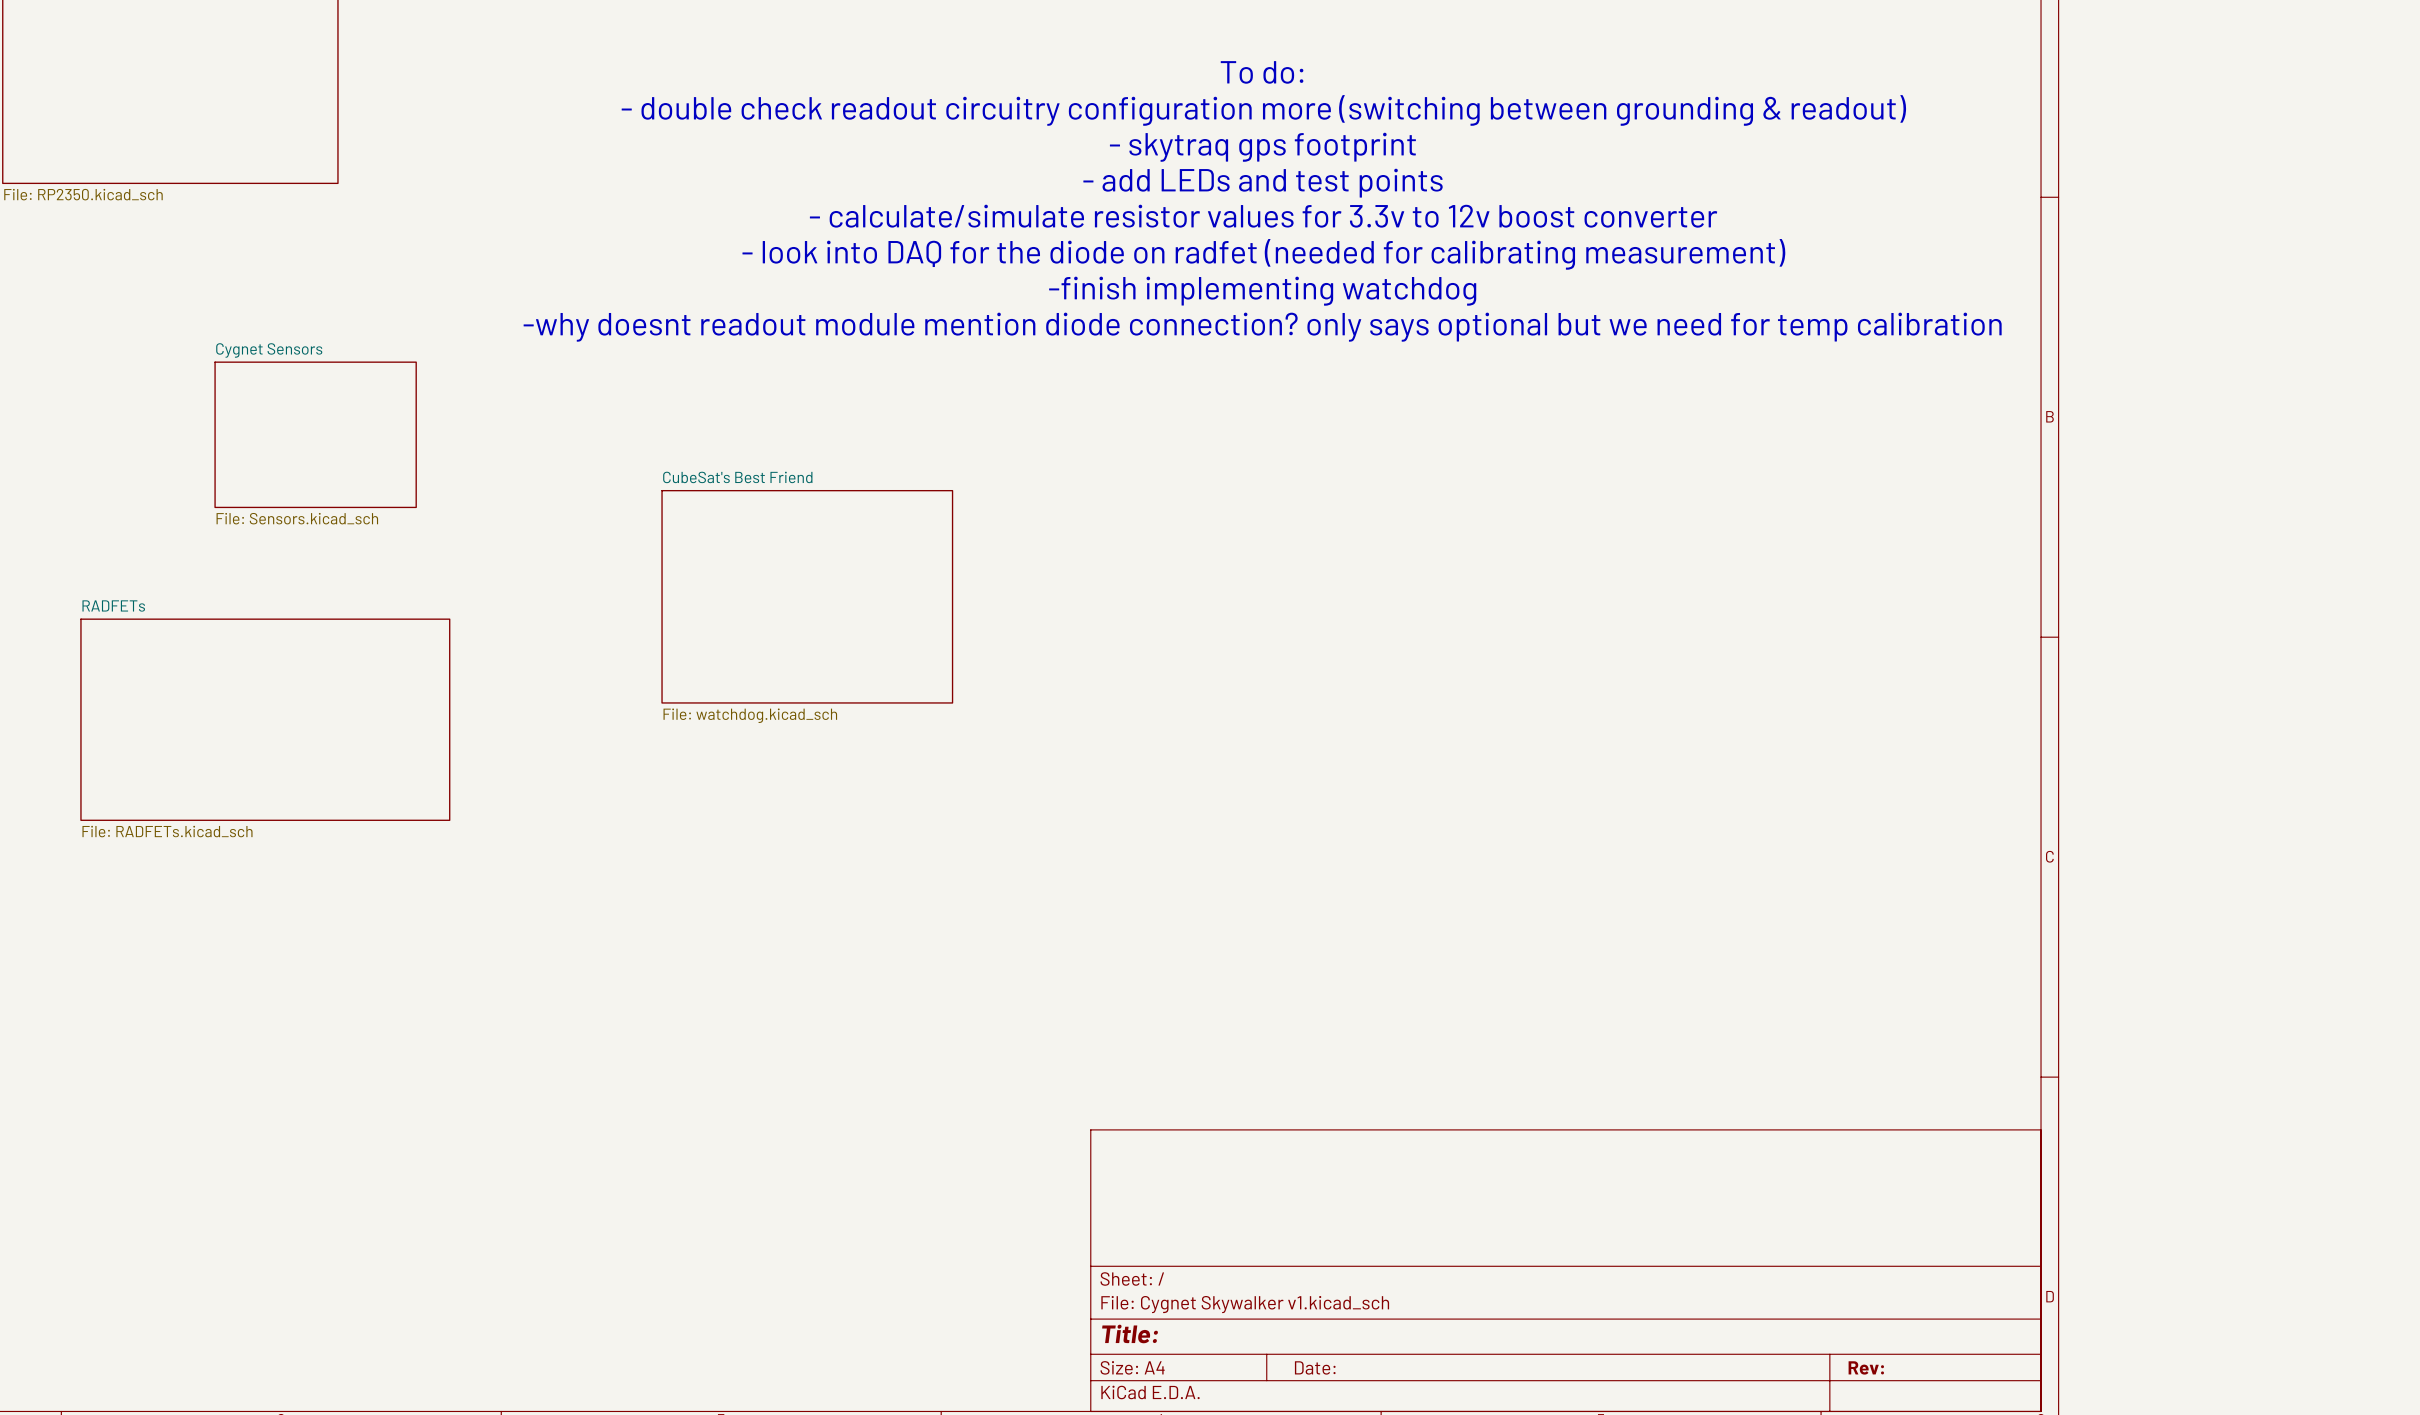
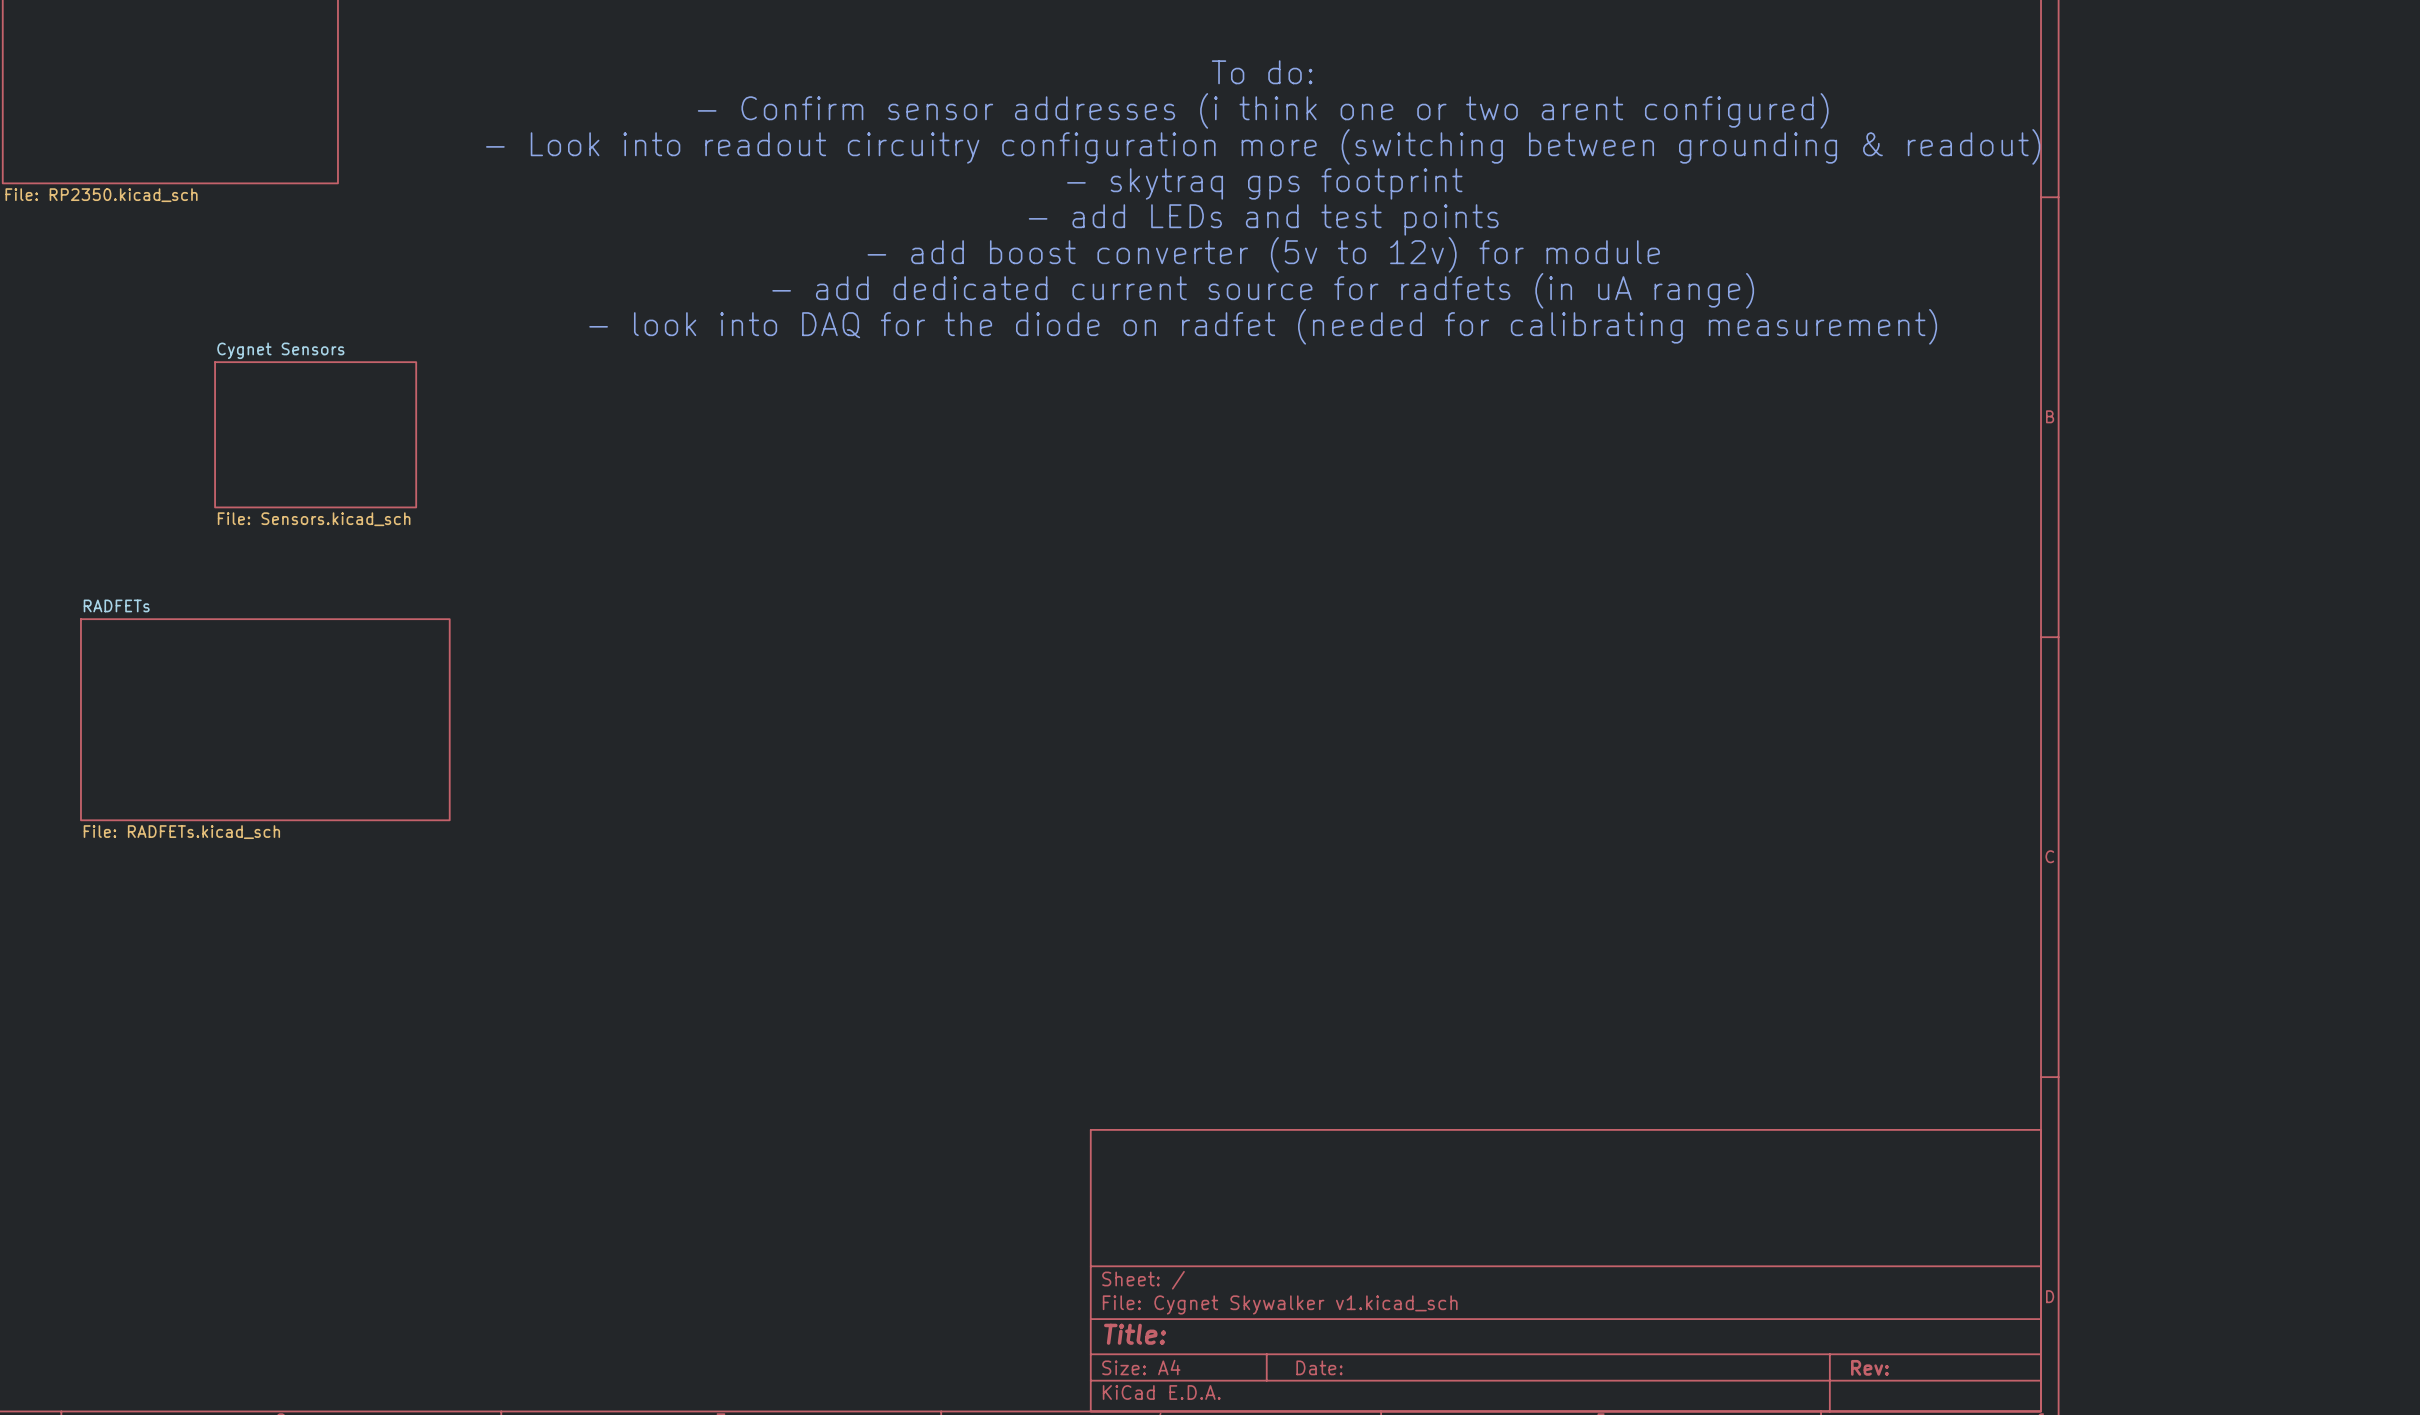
text: - double check readout circuitry configuration more (switching between grounding & readout) (1263, 110) -> - Confirm sensor addresses (i think one or two arent configured) (1263, 110)
text: - skytraq gps footprint (1262, 147) -> - Look into readout circuitry configuration more (switching between grounding & readout) (1263, 146)
text: - add LEDs and test points (1263, 183) -> - skytraq gps footprint (1264, 183)
text: - calculate/simulate resistor values for 3.3v to 12v boost converter (1263, 216) -> - add LEDs and test points (1263, 219)
text: - look into DAQ for the diode on radfet (needed for calibrating measurement) (1263, 254) -> - add boost converter (5v to 12v) for module (1263, 254)
text: -finish implementing watchdog (1262, 291) -> - add dedicated current source for radfets (in uA range) (1263, 290)
text: -why doesnt readout module mention diode connection? only says optional but we need for temp calibration (1262, 327) -> - look into DAQ for the diode on radfet (needed for calibrating measurement) (1263, 326)
sheet CubeSat's Best Friend: File: watchdog.kicad_sch (807, 596) -> none

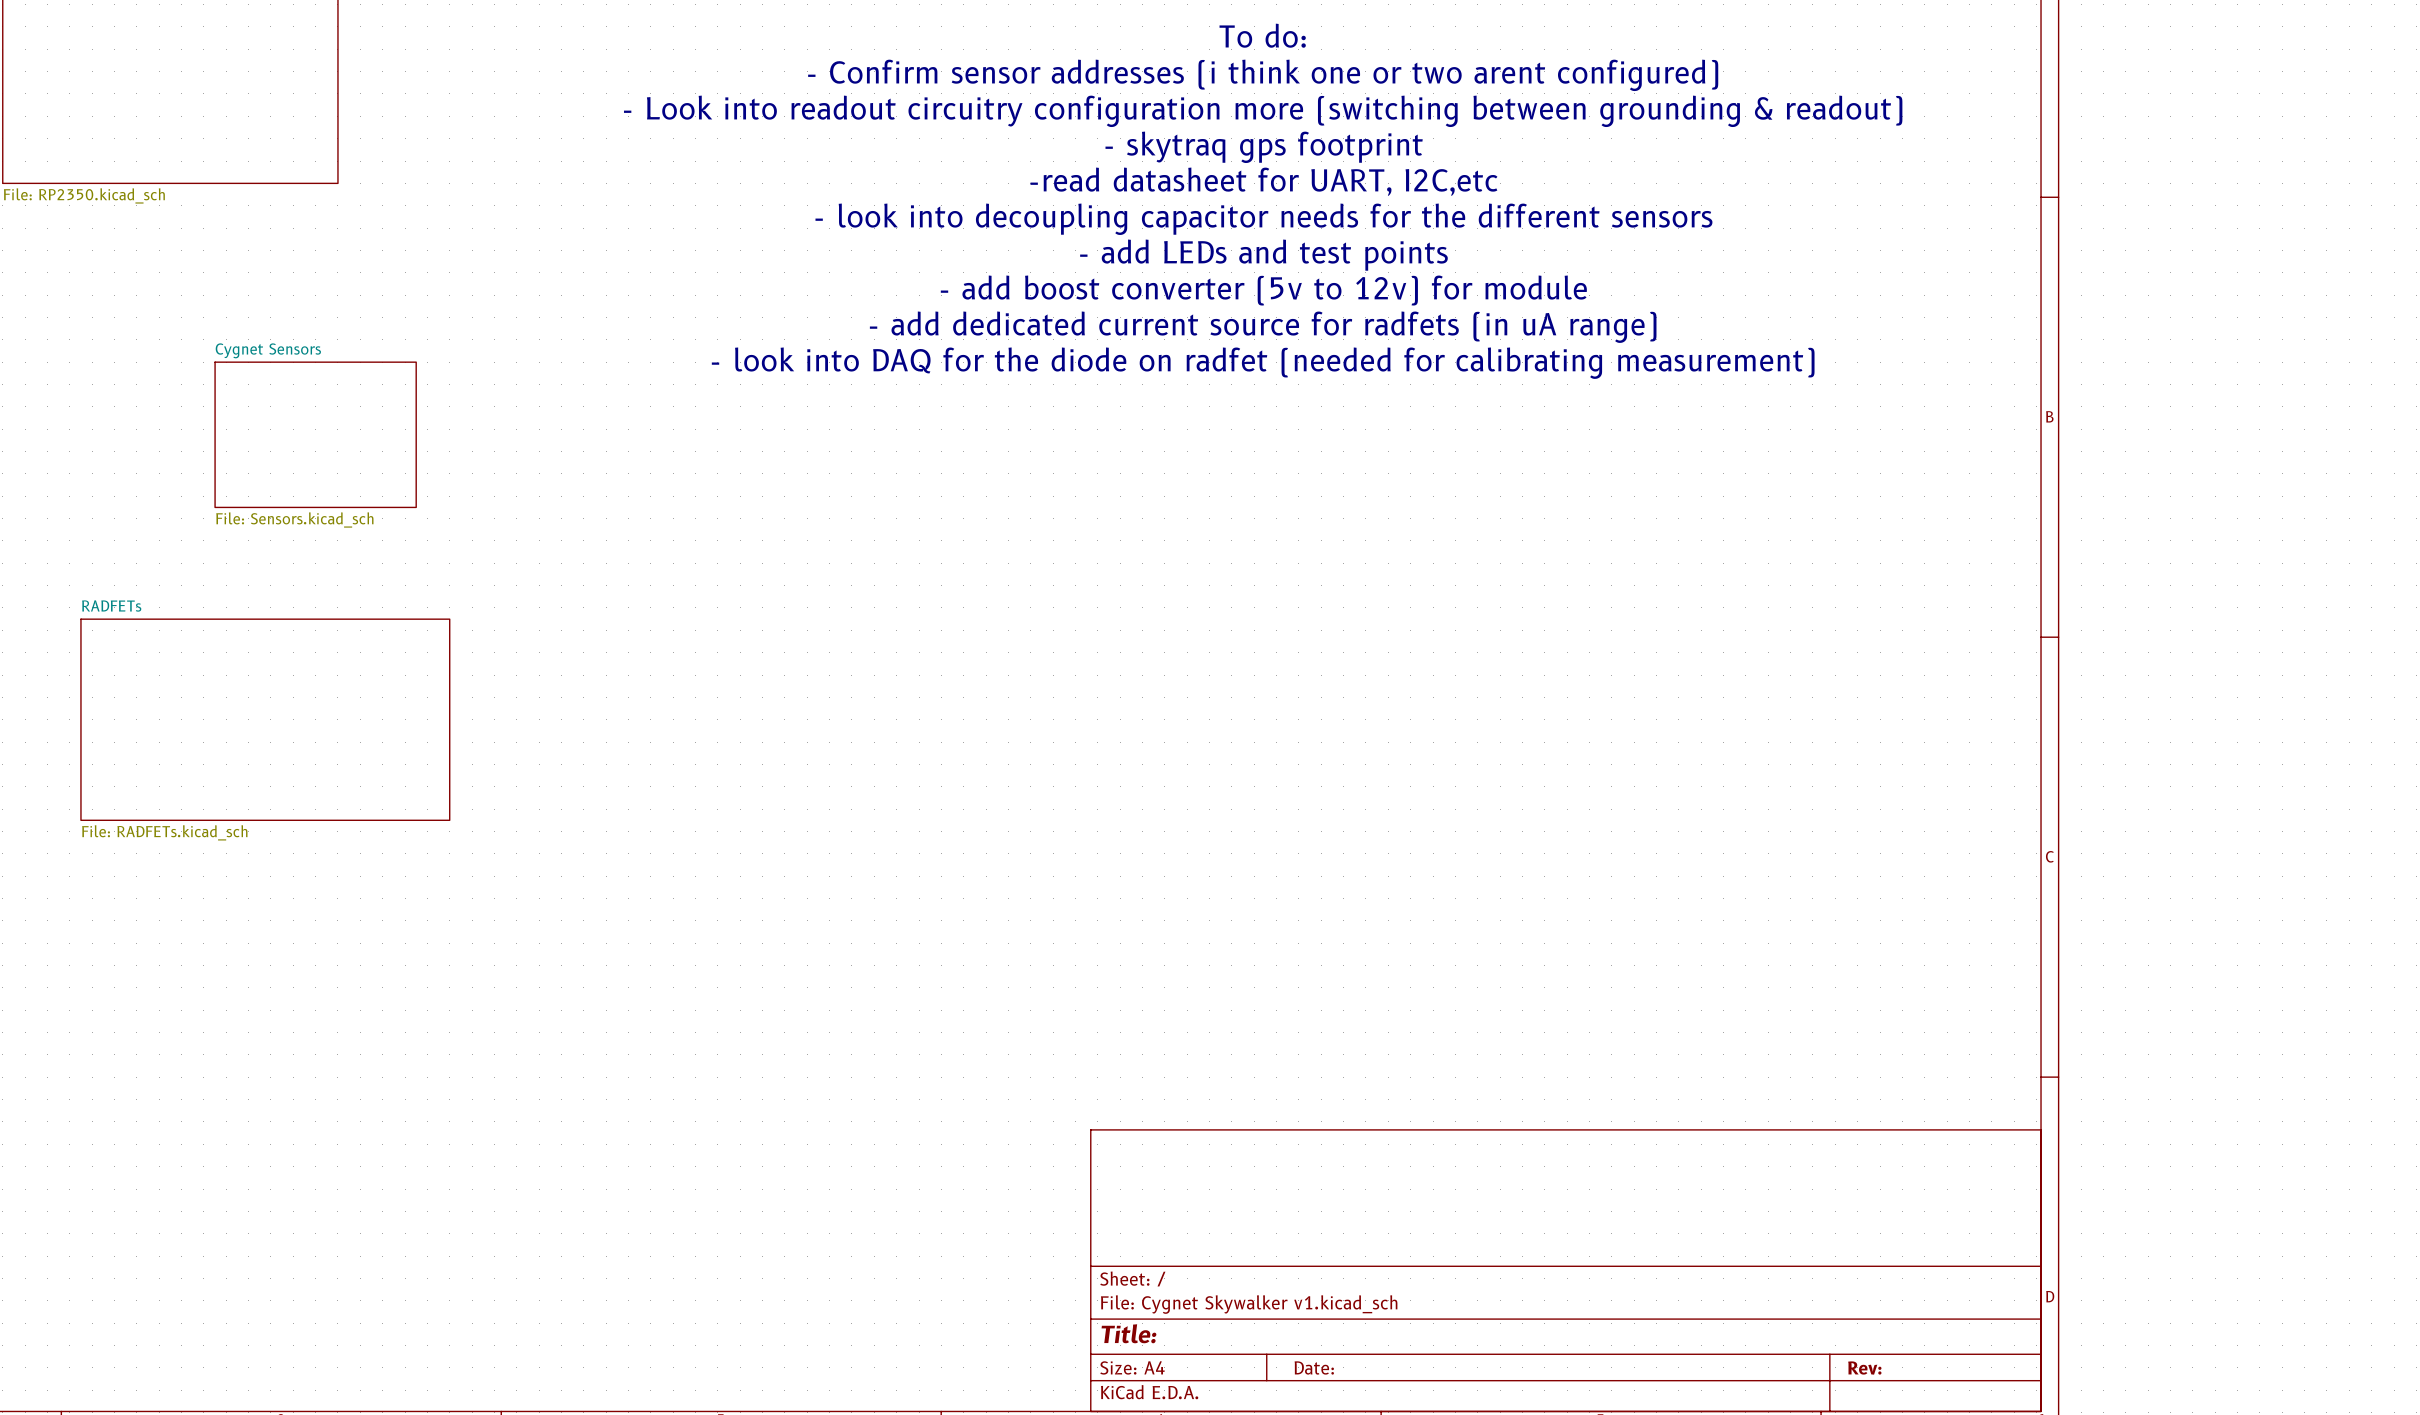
text: none -> To do: (1262, 35)
text: To do: (1262, 72) -> - Confirm sensor addresses (i think one or two arent configured) (1263, 75)
text: - Confirm sensor addresses (i think one or two arent configured) (1263, 110) -> - Look into readout circuitry configuration more (switching between grounding & readout) (1263, 111)
text: - Look into readout circuitry configuration more (switching between grounding & readout) (1263, 146) -> - skytraq gps footprint (1264, 147)
text: - skytraq gps footprint (1264, 183) -> -read datasheet for UART, I2C,etc (1263, 181)
text: - add LEDs and test points (1263, 219) -> - look into decoupling capacitor needs for the different sensors (1263, 219)
text: - add boost converter (5v to 12v) for module (1263, 254) -> - add LEDs and test points (1263, 255)
text: - add dedicated current source for radfets (in uA range) (1263, 290) -> - add boost converter (5v to 12v) for module (1263, 290)
text: - look into DAQ for the diode on radfet (needed for calibrating measurement) (1263, 326) -> - add dedicated current source for radfets (in uA range) (1263, 327)
text: none -> - look into DAQ for the diode on radfet (needed for calibrating measurement) (1263, 363)

